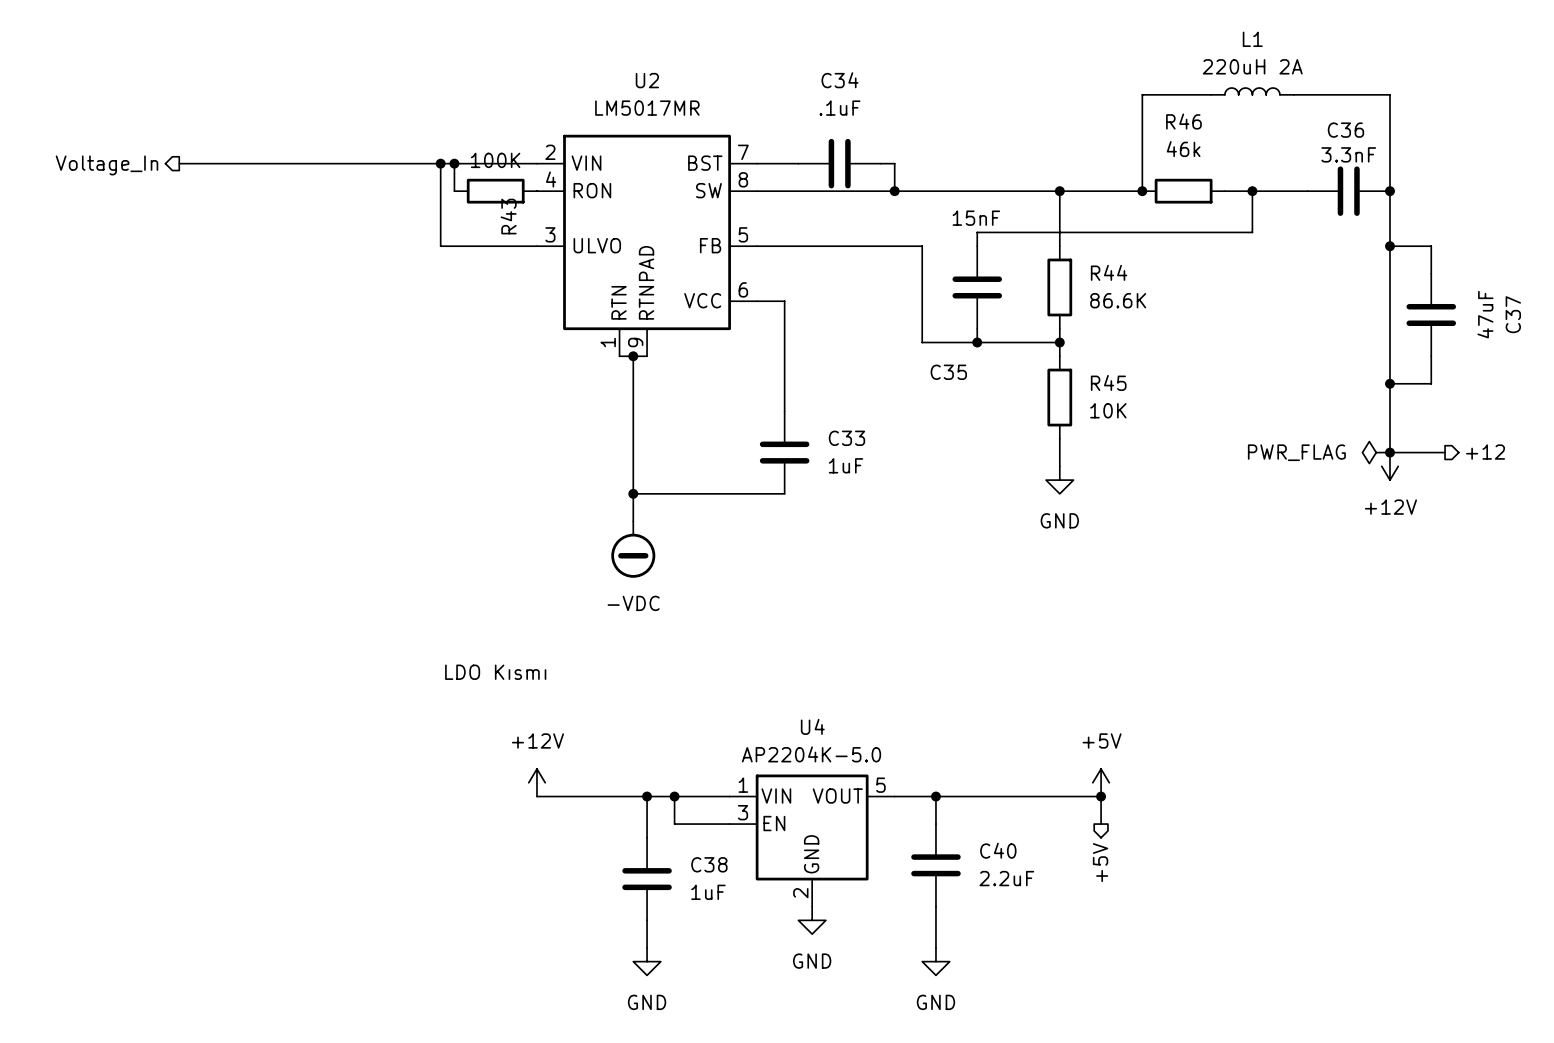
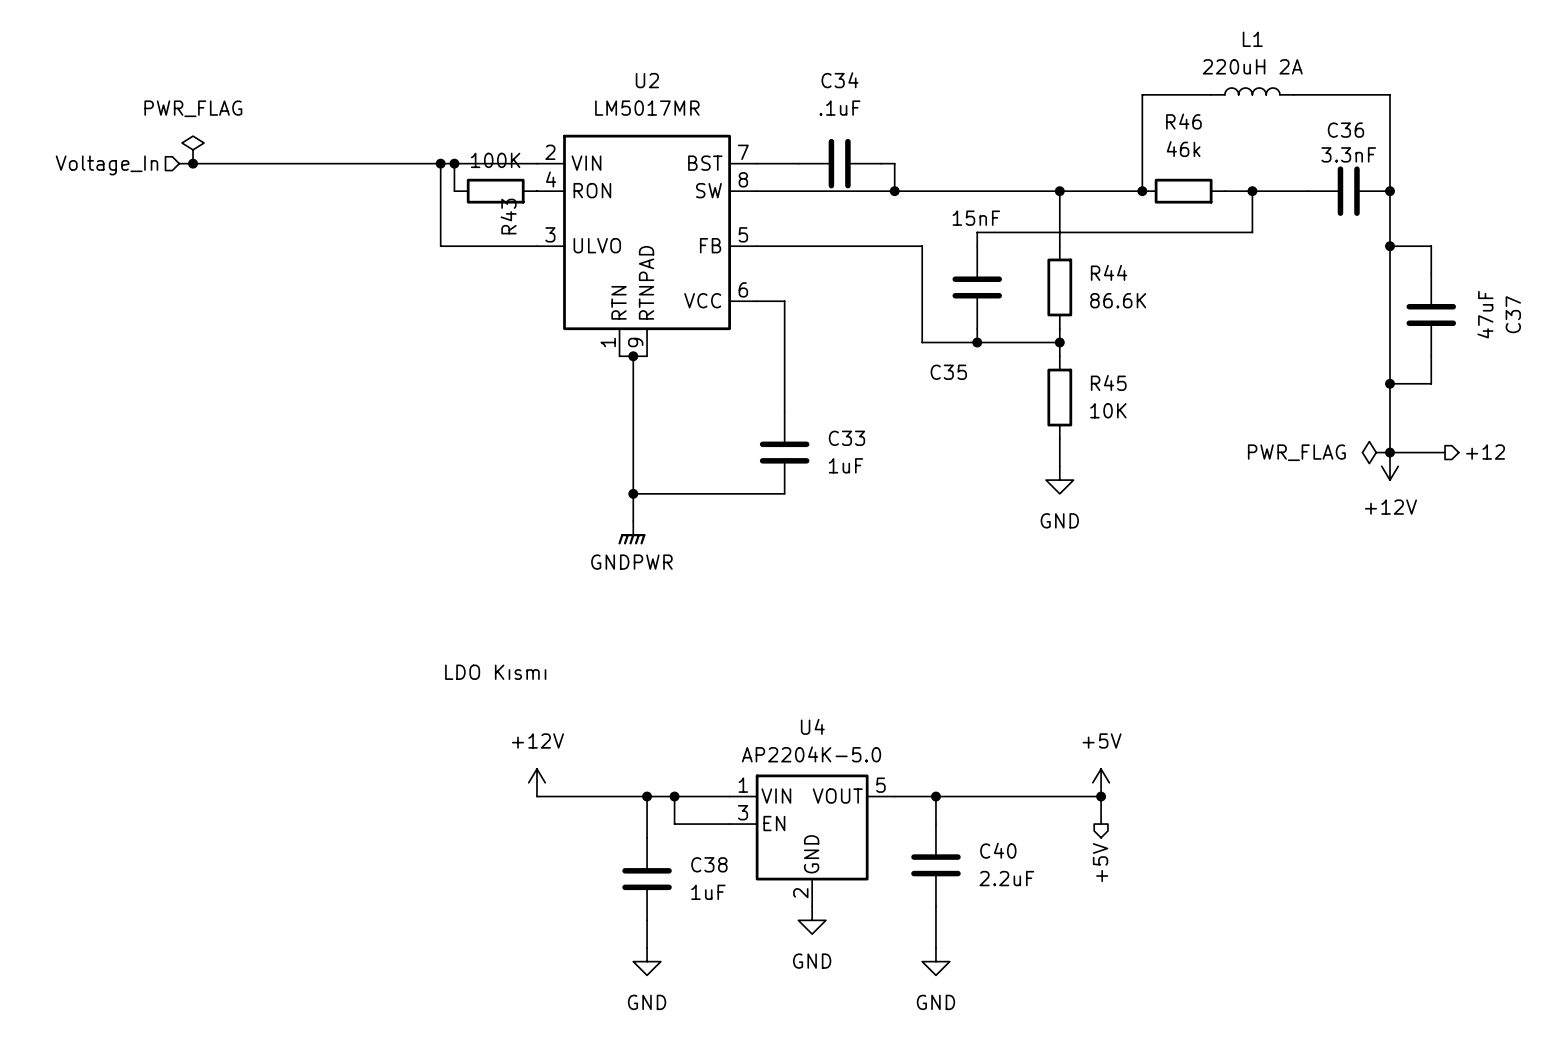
power symbol: none -> PWR_FLAG (193, 149)
junction: none -> (193, 163)
hierarchical label shape: output (106, 165) -> input (106, 165)
power symbol: none -> GNDPWR (631, 532)
power symbol: -VDC (633, 549) -> none

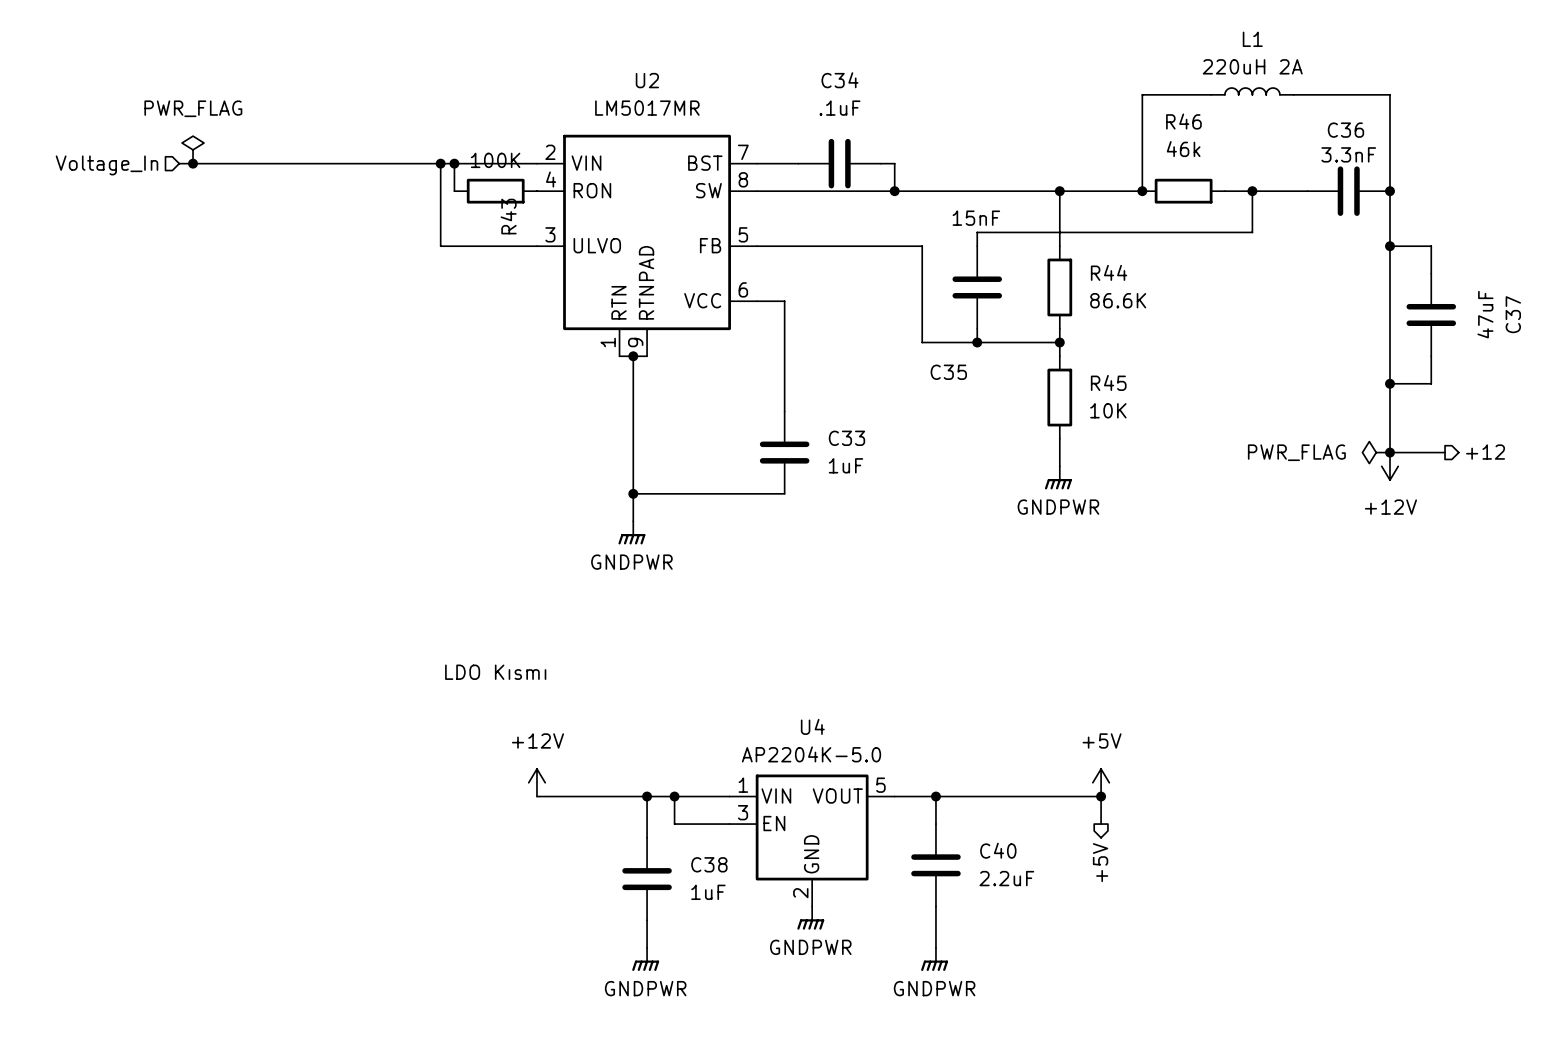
power symbol: GND (1059, 480) -> GNDPWR (1058, 477)
power symbol: GND (812, 920) -> GNDPWR (810, 918)
power symbol: GND (647, 961) -> GNDPWR (645, 959)
power symbol: GND (935, 961) -> GNDPWR (934, 959)

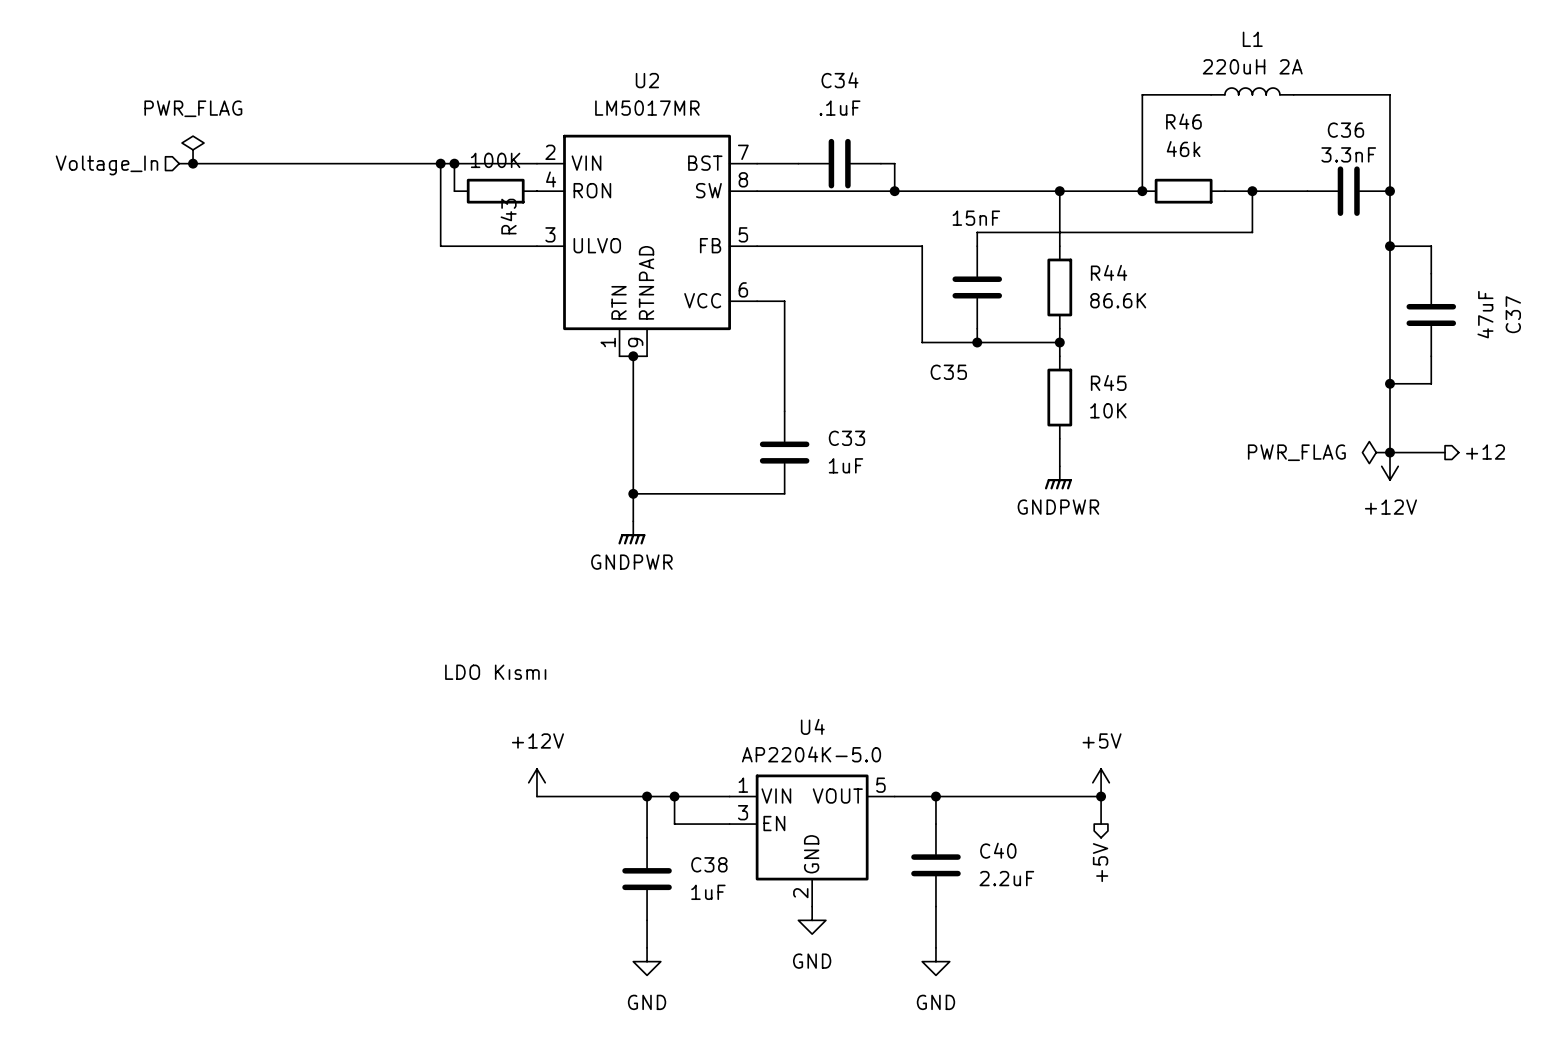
power symbol: GNDPWR (810, 918) -> GND (812, 920)
power symbol: GNDPWR (645, 959) -> GND (647, 961)
power symbol: GNDPWR (934, 959) -> GND (935, 961)

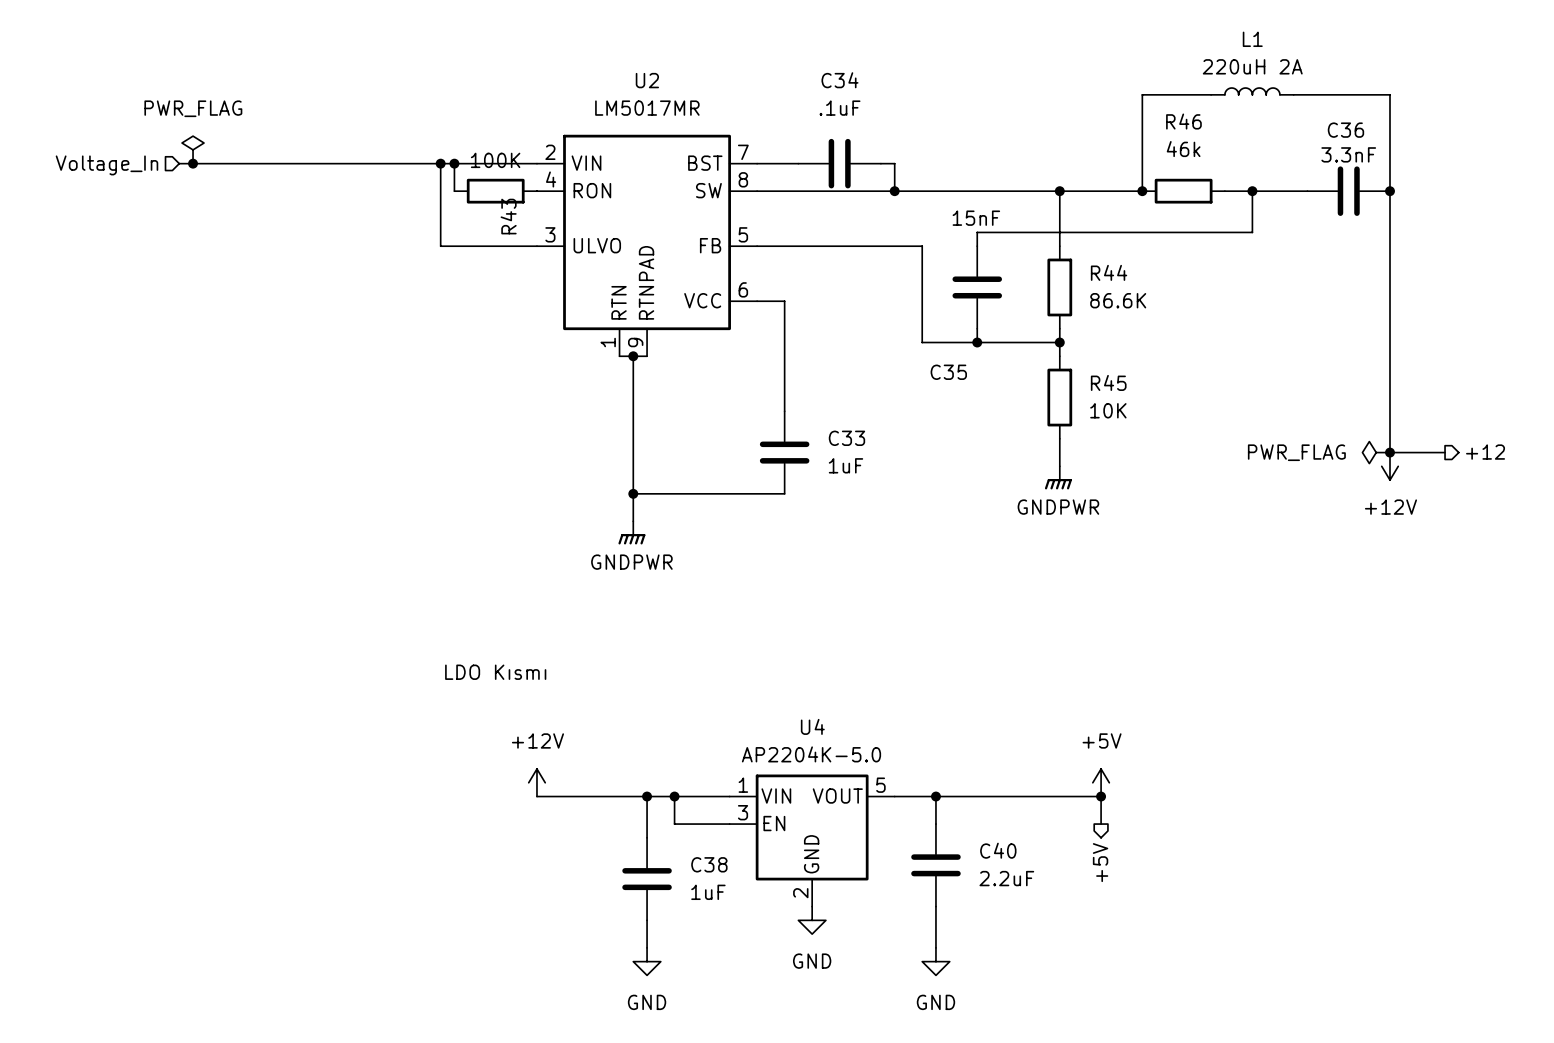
wire: (1389, 246) (1431, 246) (1431, 273) -> none
junction: (1389, 246) -> none
C37: 47uF (1431, 314) -> none
wire: (1431, 356) (1431, 383) (1389, 383) -> none
junction: (1389, 383) -> none

